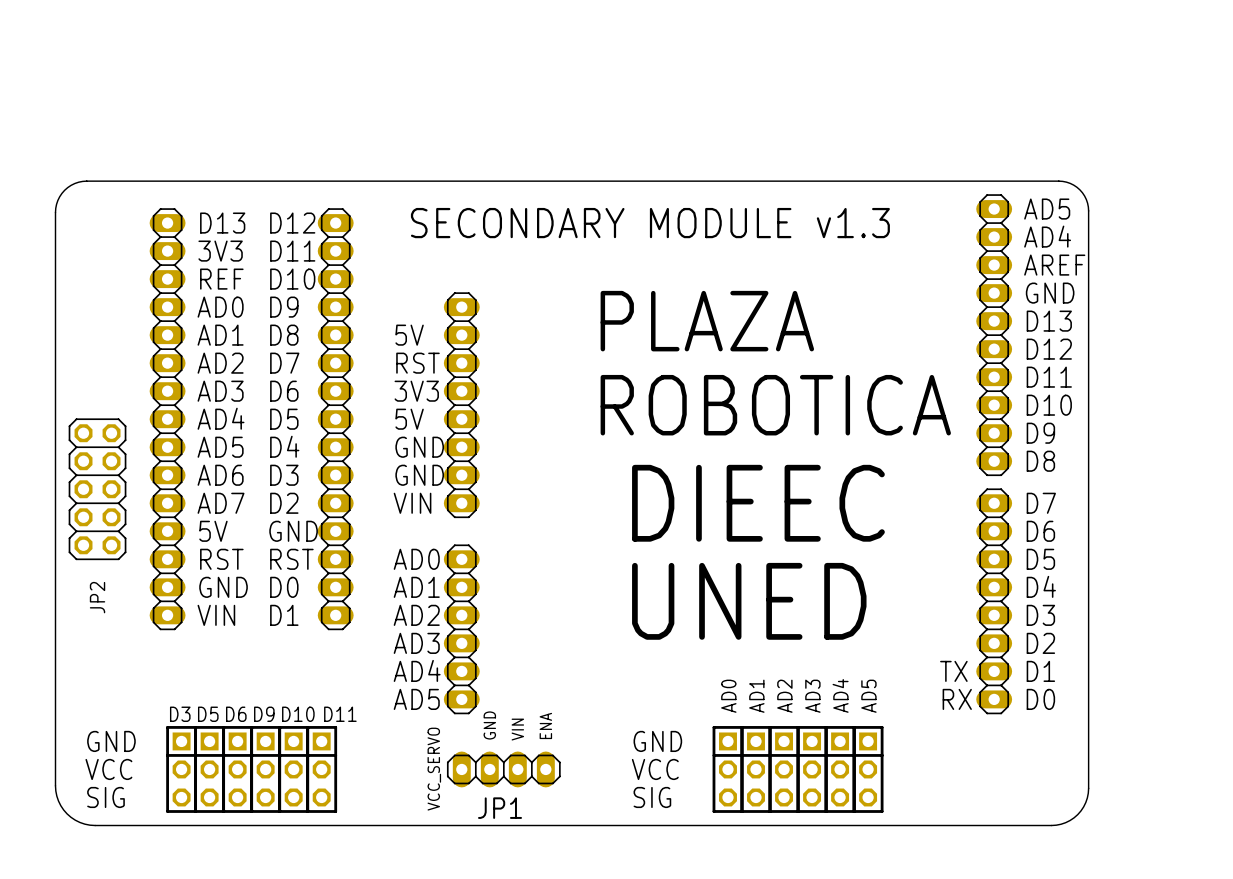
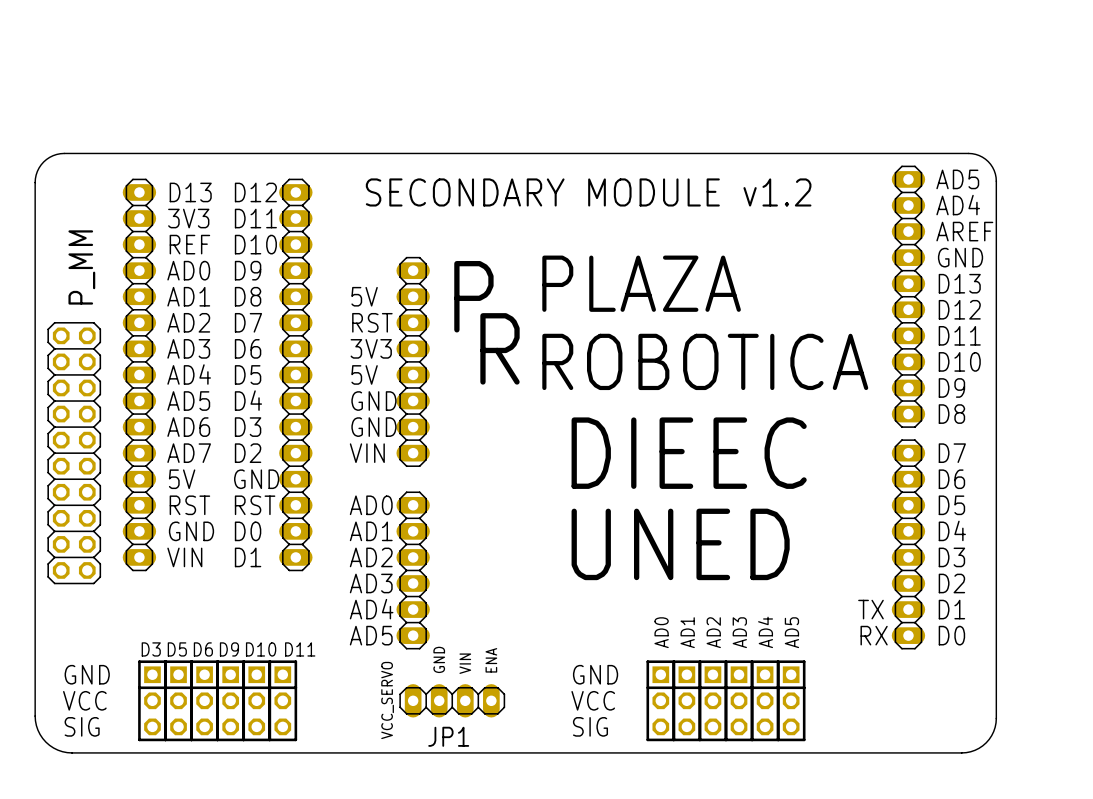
text: SECONDARY MODULE v1.3 (650, 223) -> SECONDARY MODULE v1.2 (588, 192)
text: none -> P (473, 296)
text: none -> R (499, 348)
JP2: (97, 489) -> none
P_MM: none -> (74, 453)

